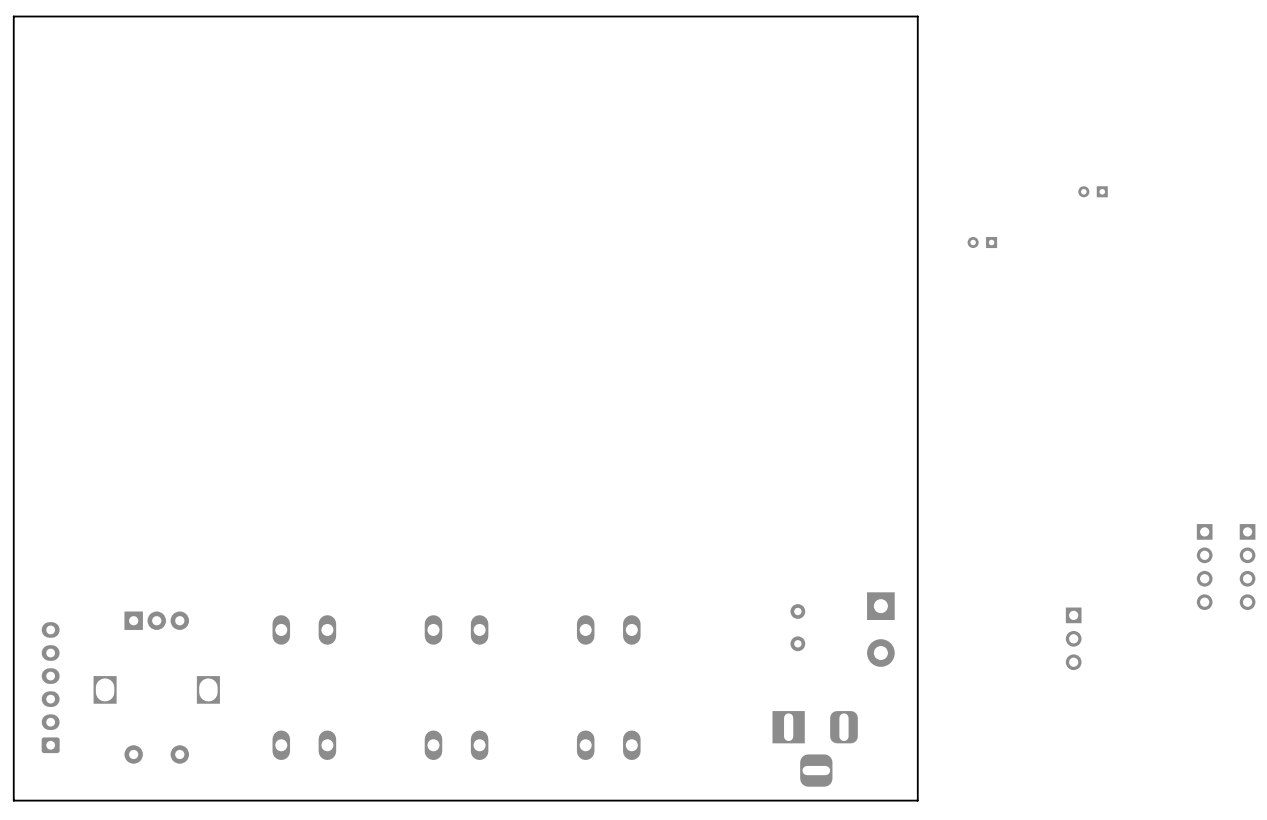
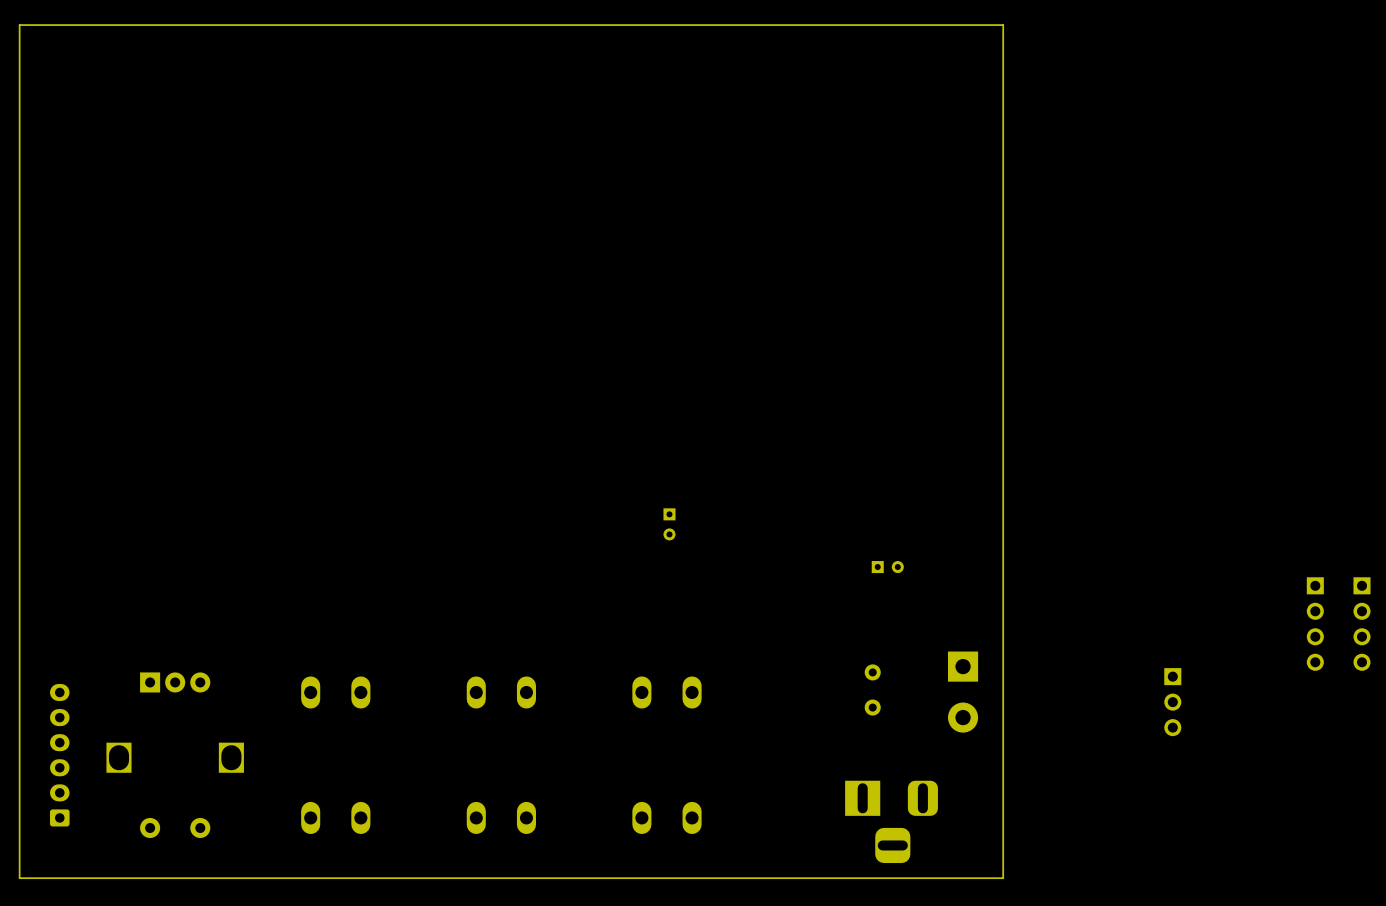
part: (1093, 191) -> none
part: (982, 242) -> none
part: none -> (669, 524)
part: none -> (887, 567)

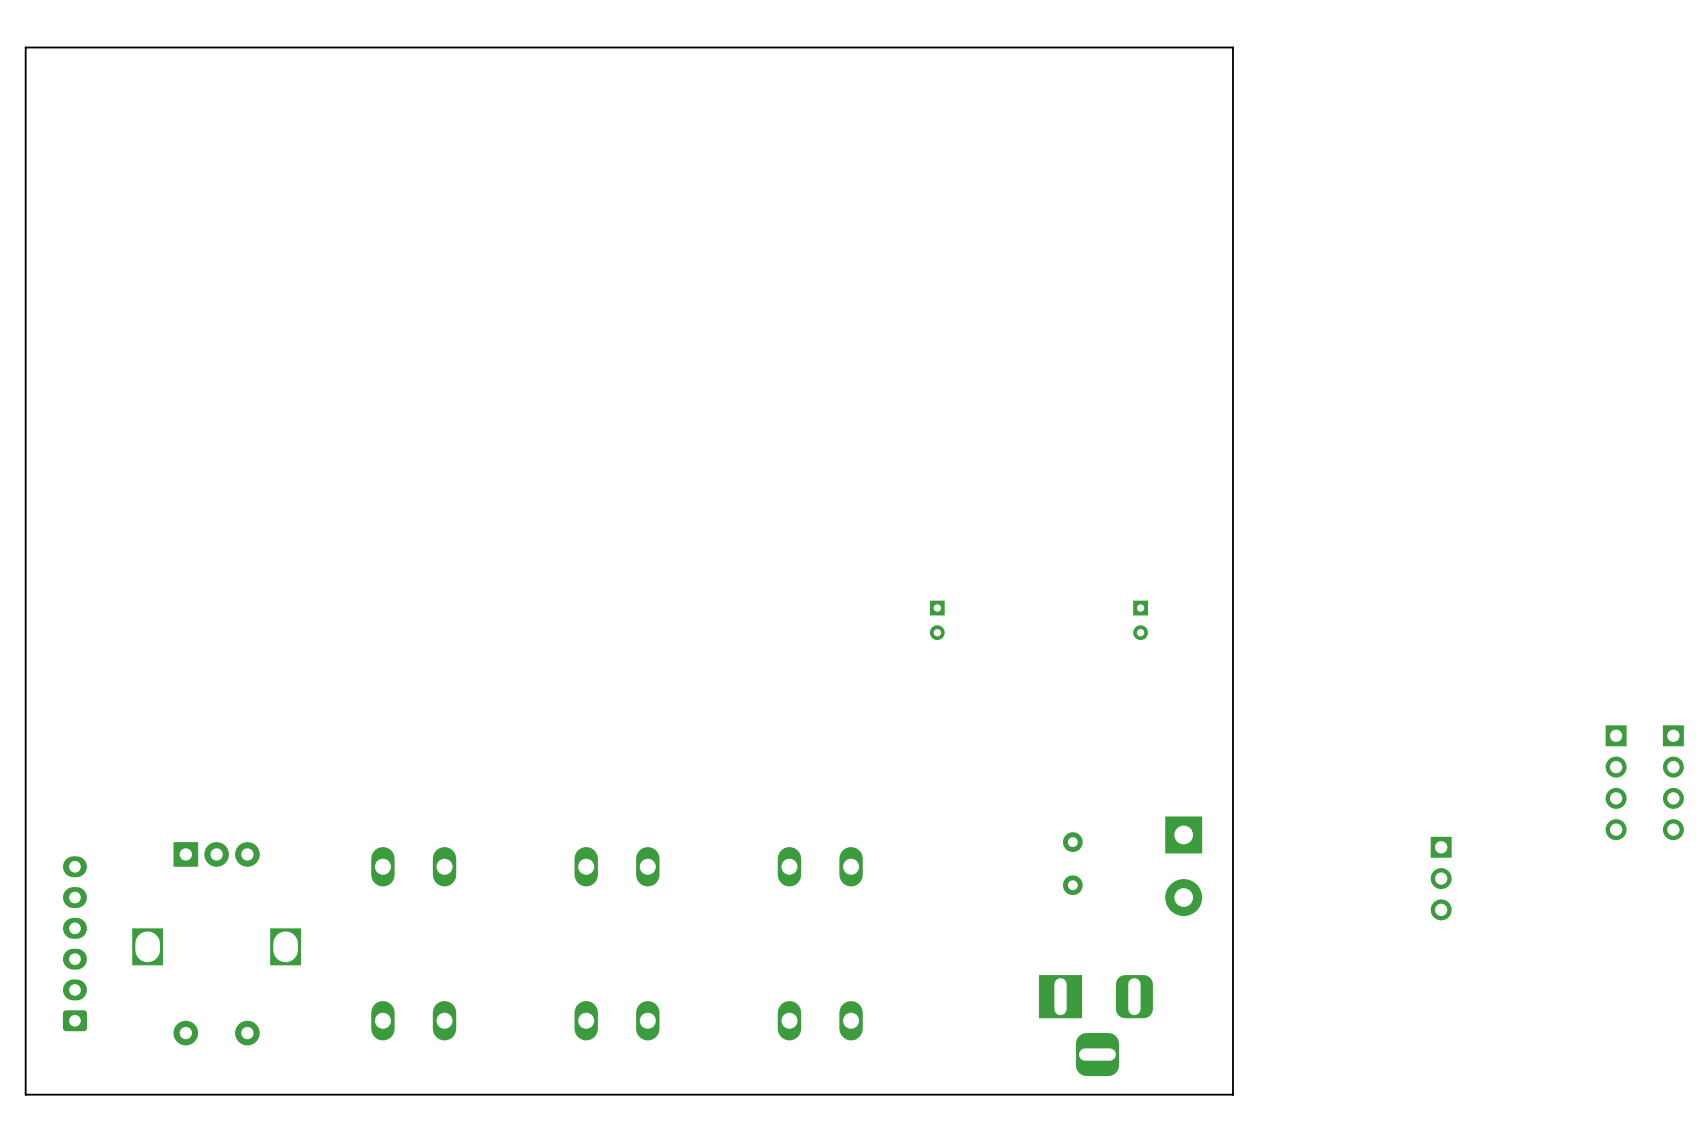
part: none -> (937, 620)
part: none -> (1140, 620)
part: (669, 524) -> none
part: (887, 567) -> none

